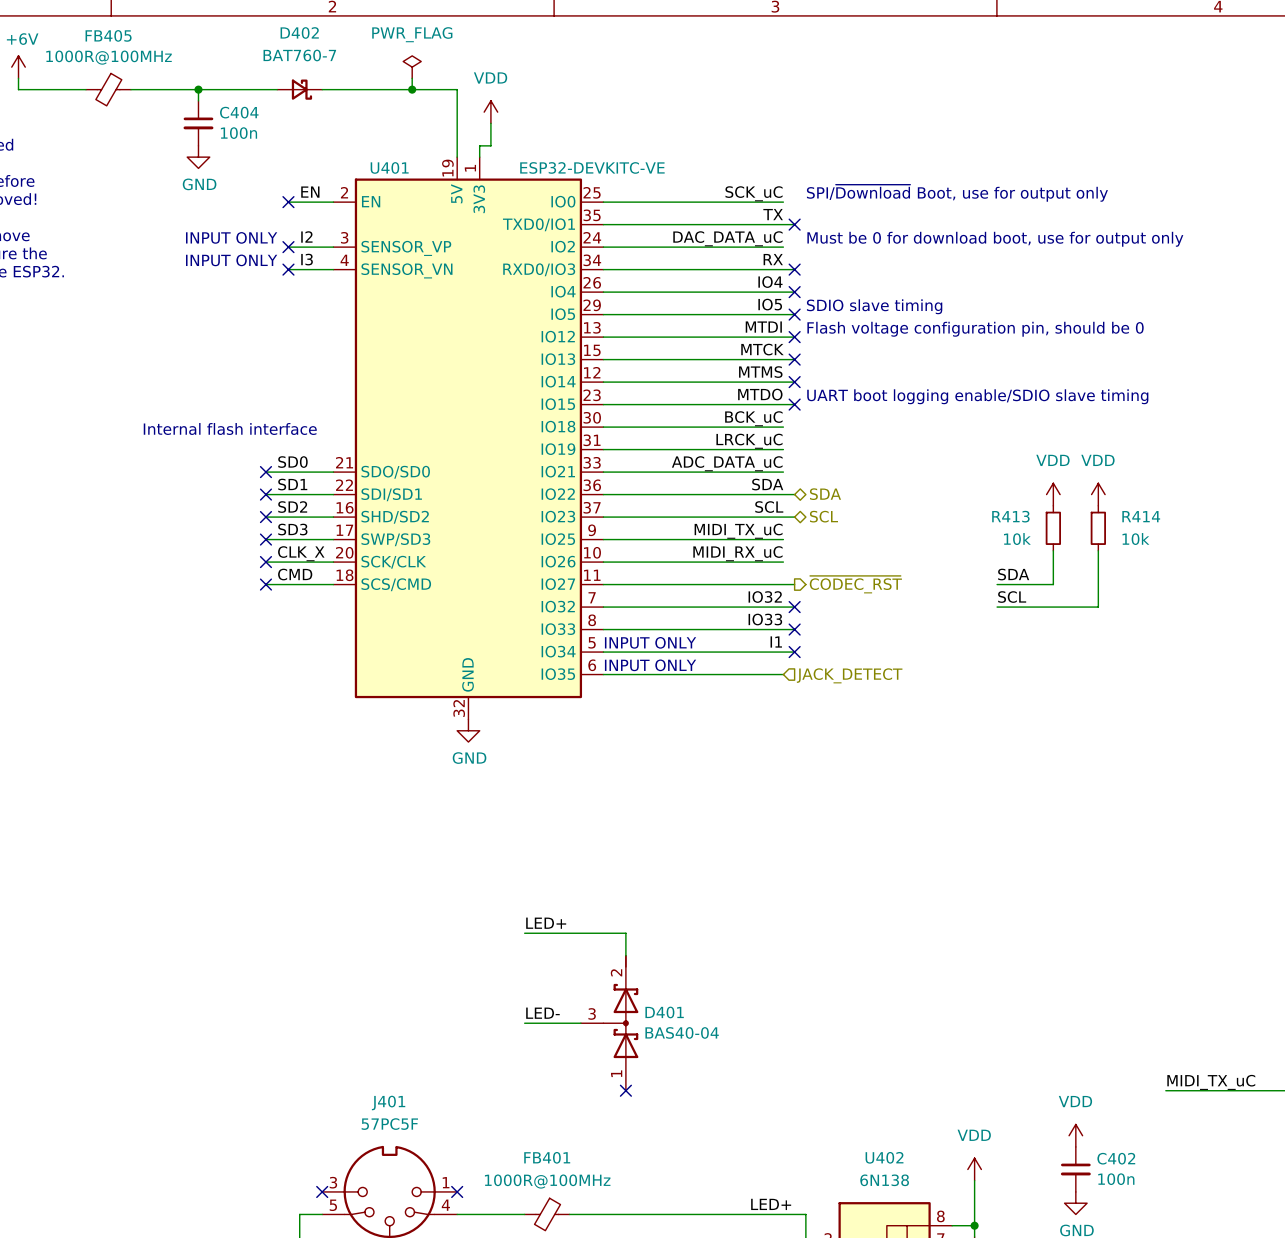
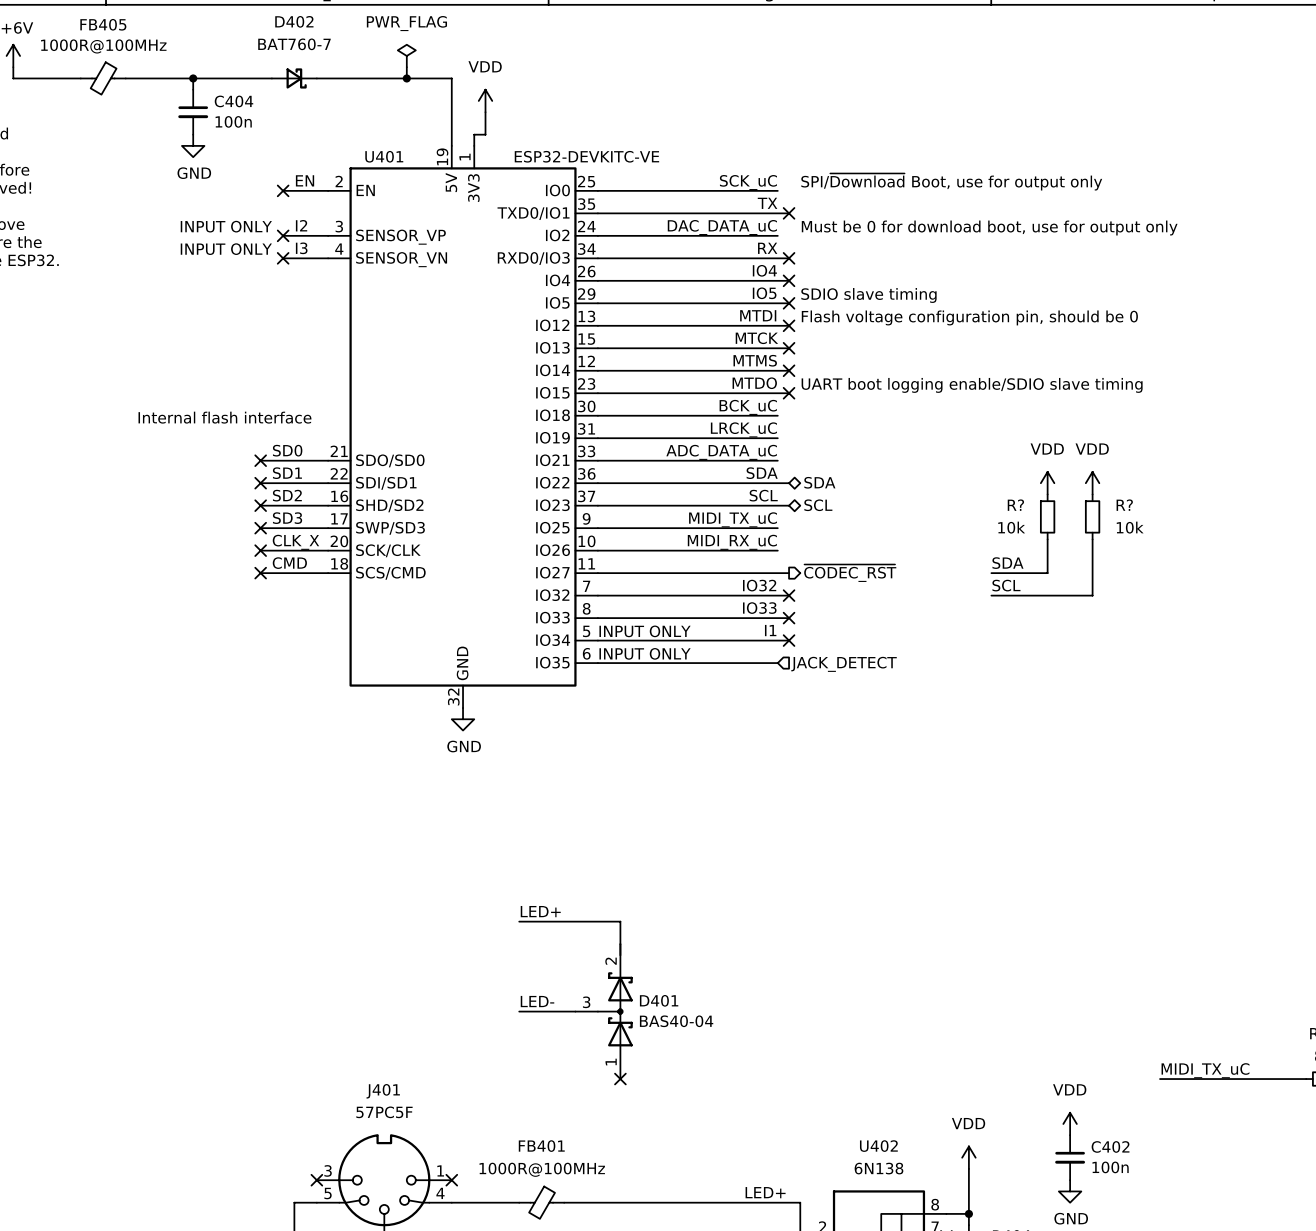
R413 name: R413 (1010, 516) -> R? (1015, 505)
R414 name: R414 (1141, 516) -> R? (1124, 505)

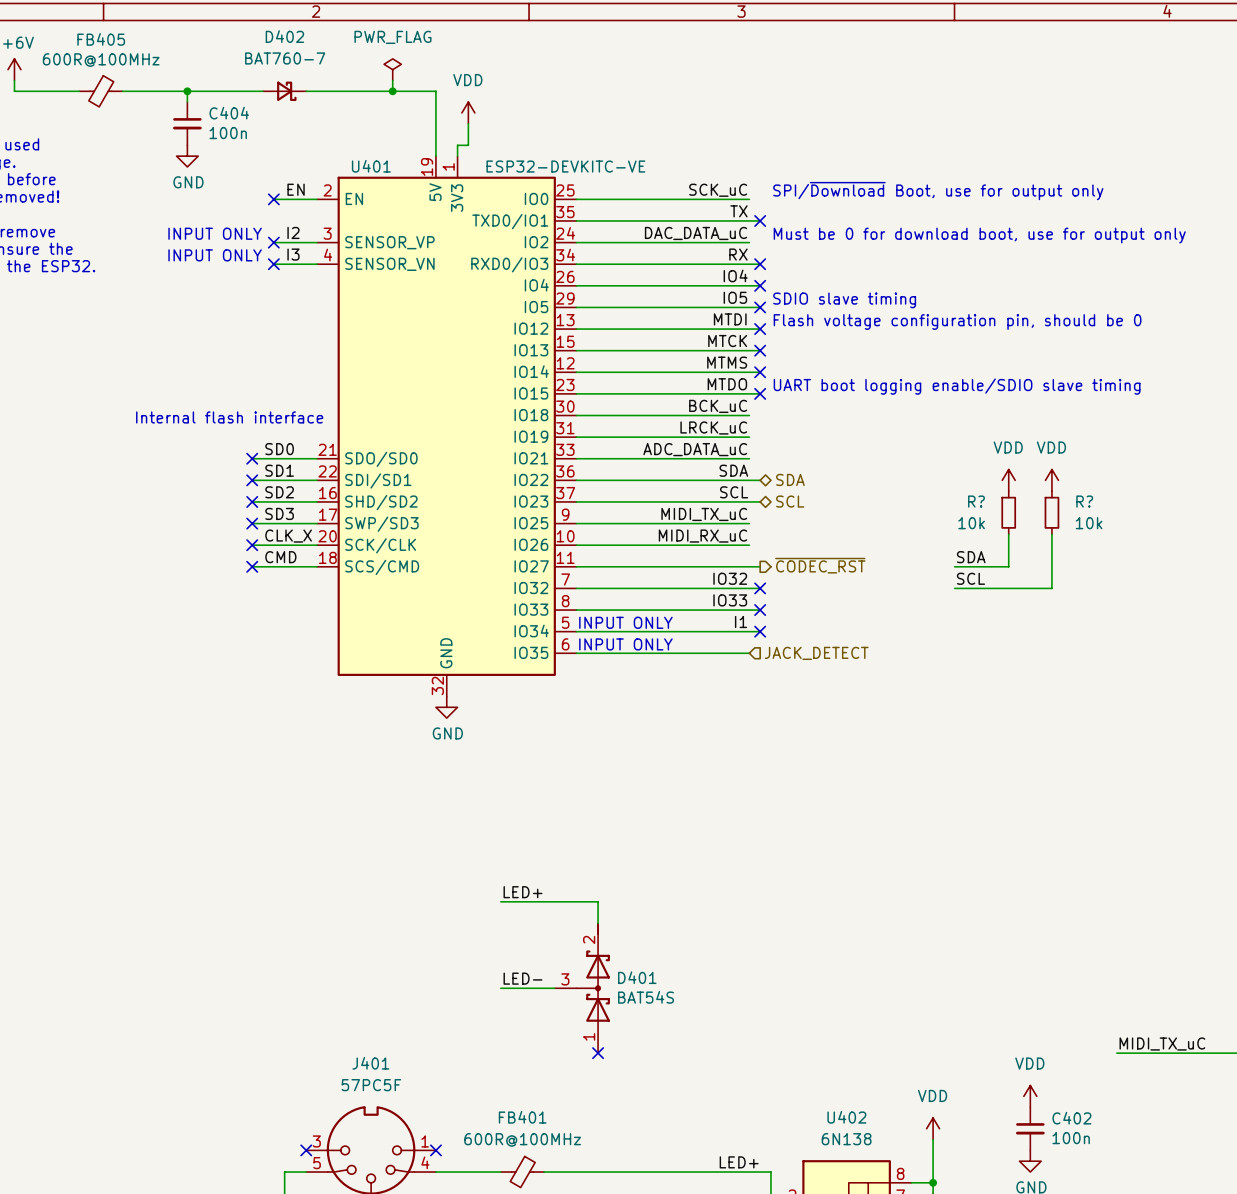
FB405 value: 1000R@100MHz (103, 46) -> 600R@100MHz (101, 60)
D401 value: BAS40-04 (676, 1021) -> BAT54S (646, 997)
FB401 value: 1000R@100MHz (542, 1169) -> 600R@100MHz (522, 1139)

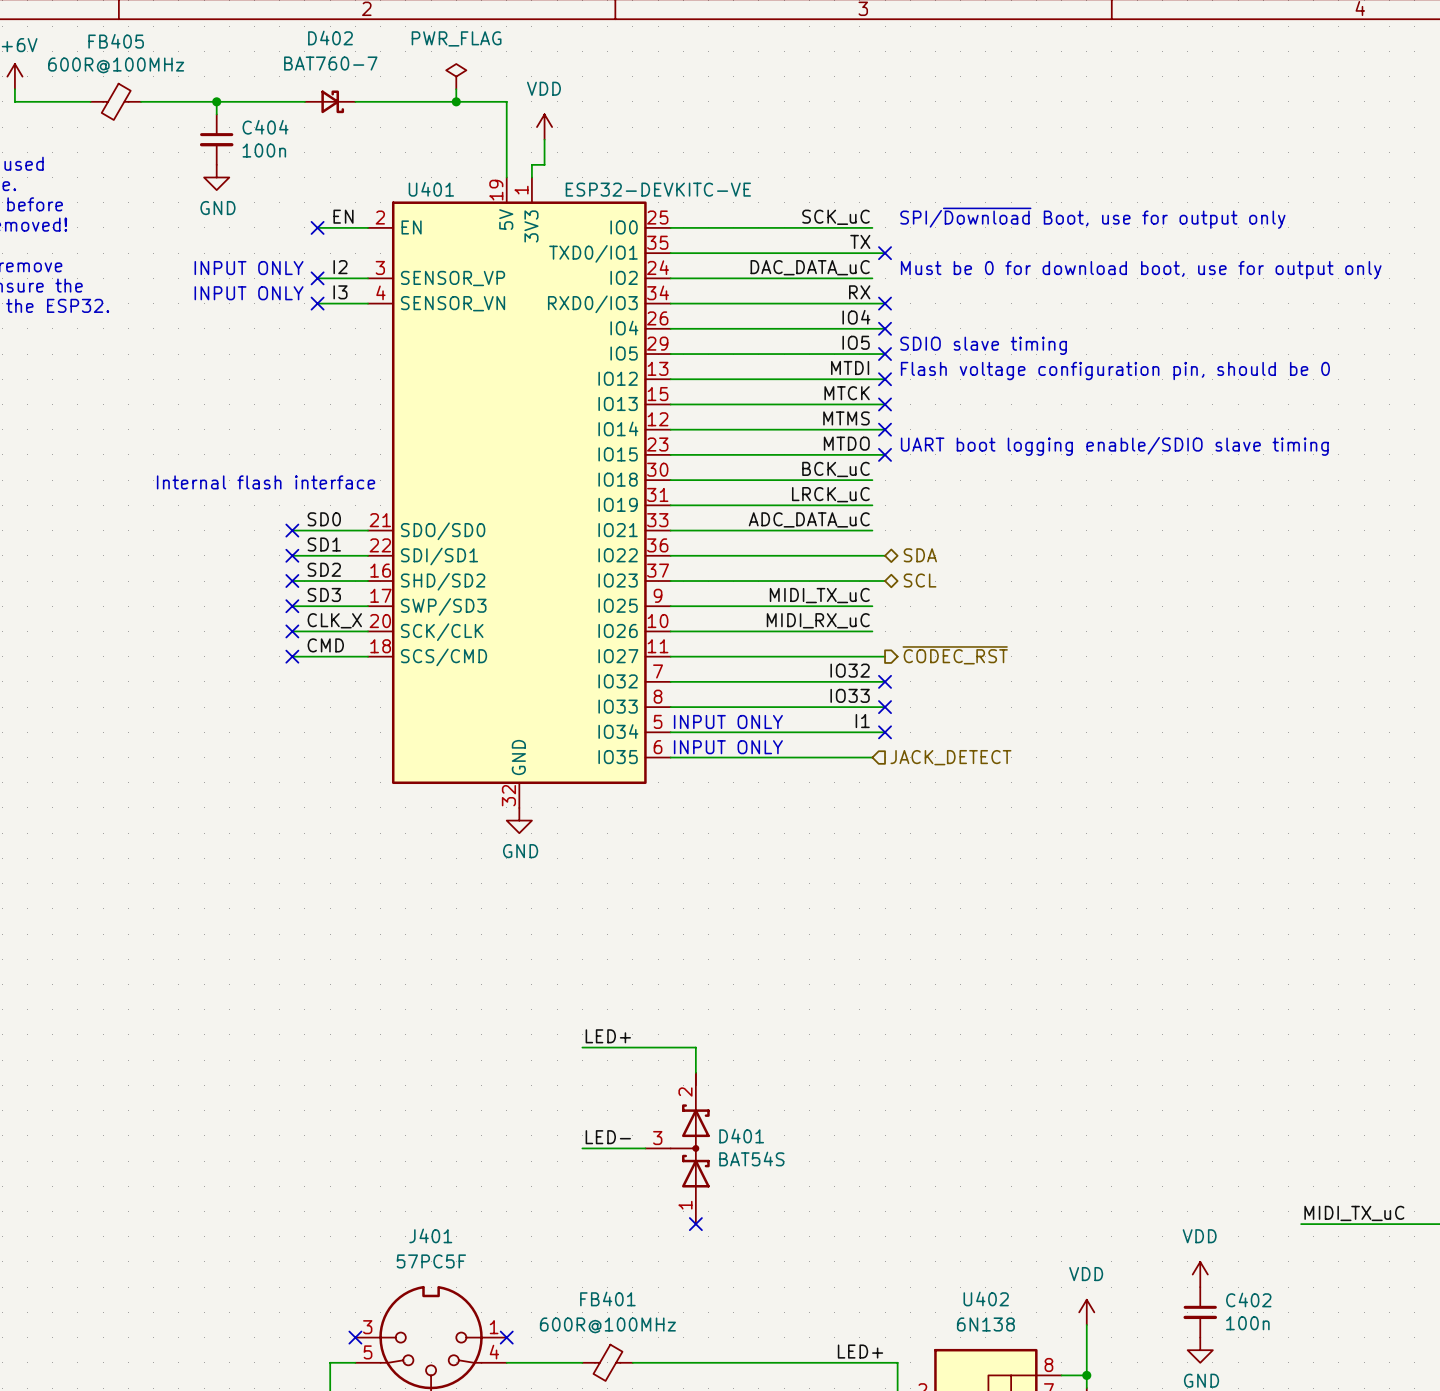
label: SDA (733, 470) -> none
power symbol: VDD (1008, 480) -> none
power symbol: VDD (1051, 480) -> none
label: SCL (734, 492) -> none
R?: 10k (1008, 512) -> none
R?: 10k (1051, 512) -> none
wire: (1008, 534) (1008, 566) (954, 566) -> none
wire: (1051, 534) (1051, 588) (954, 588) -> none
label: SDA (971, 557) -> none
label: SCL (970, 578) -> none

